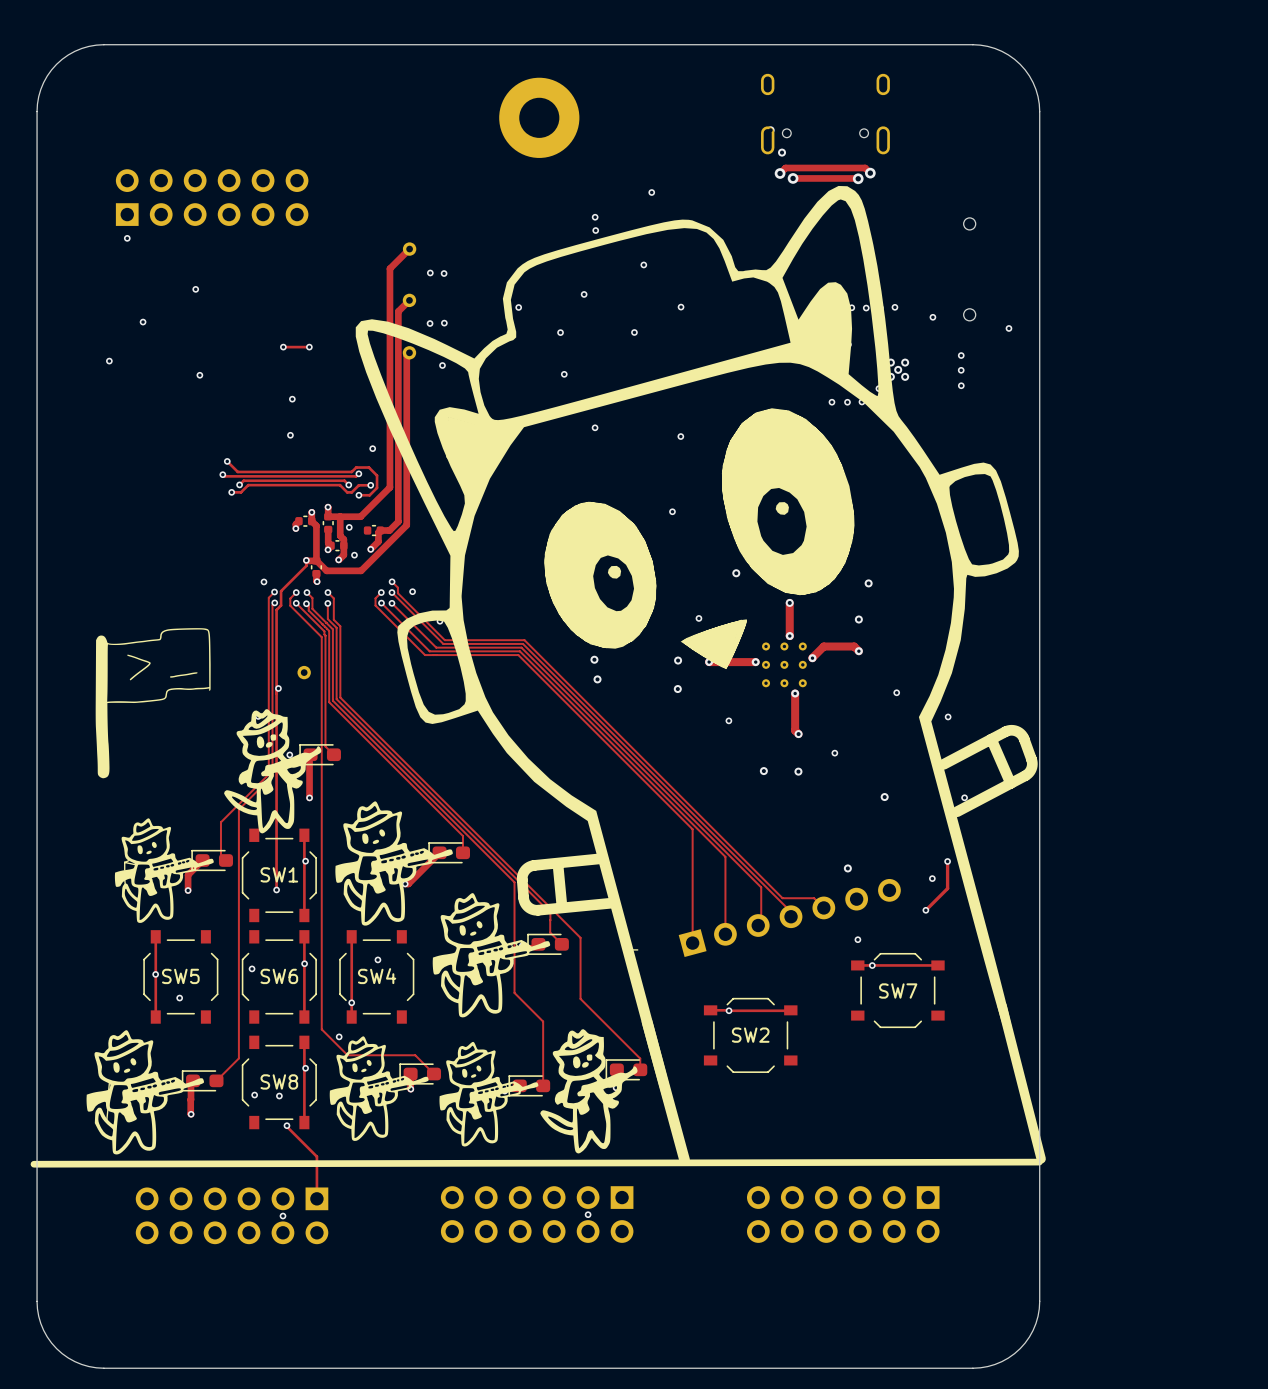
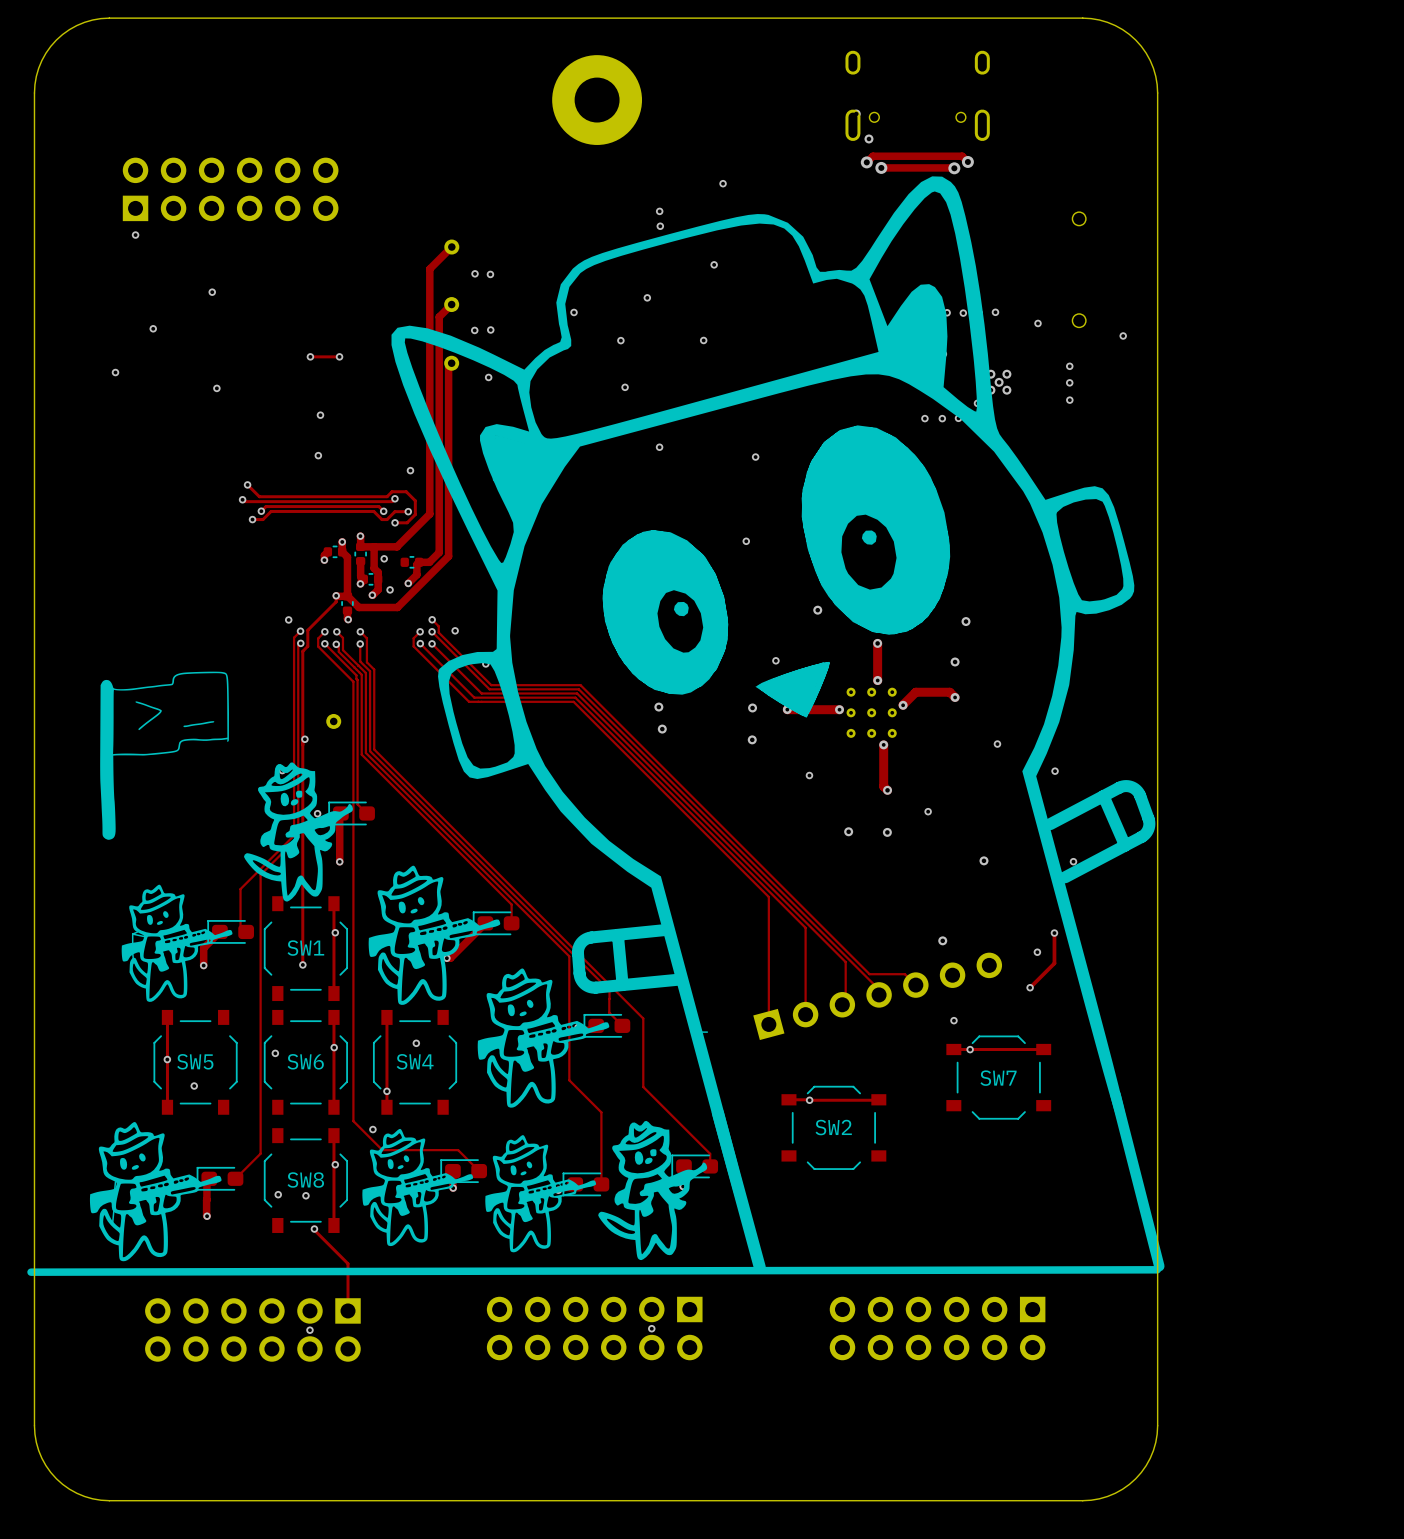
via: (681, 307) -> none

